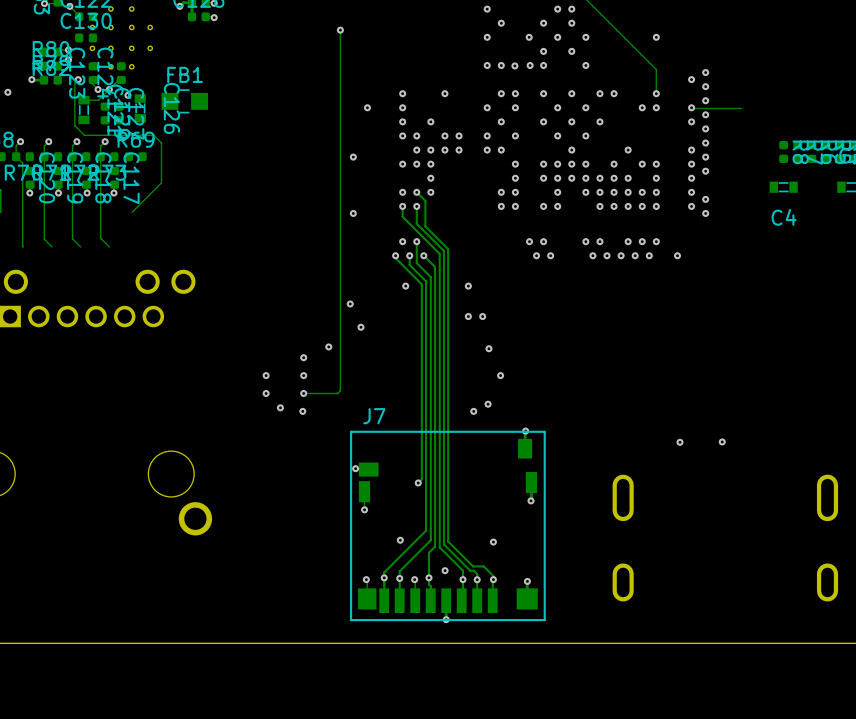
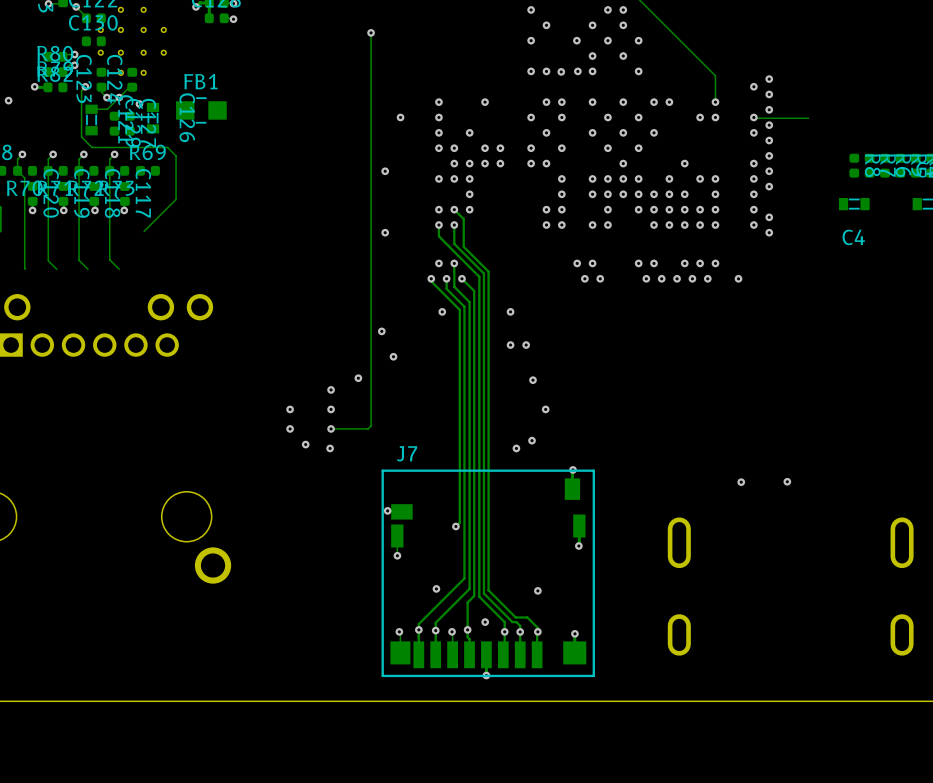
via: (656, 37) -> none

